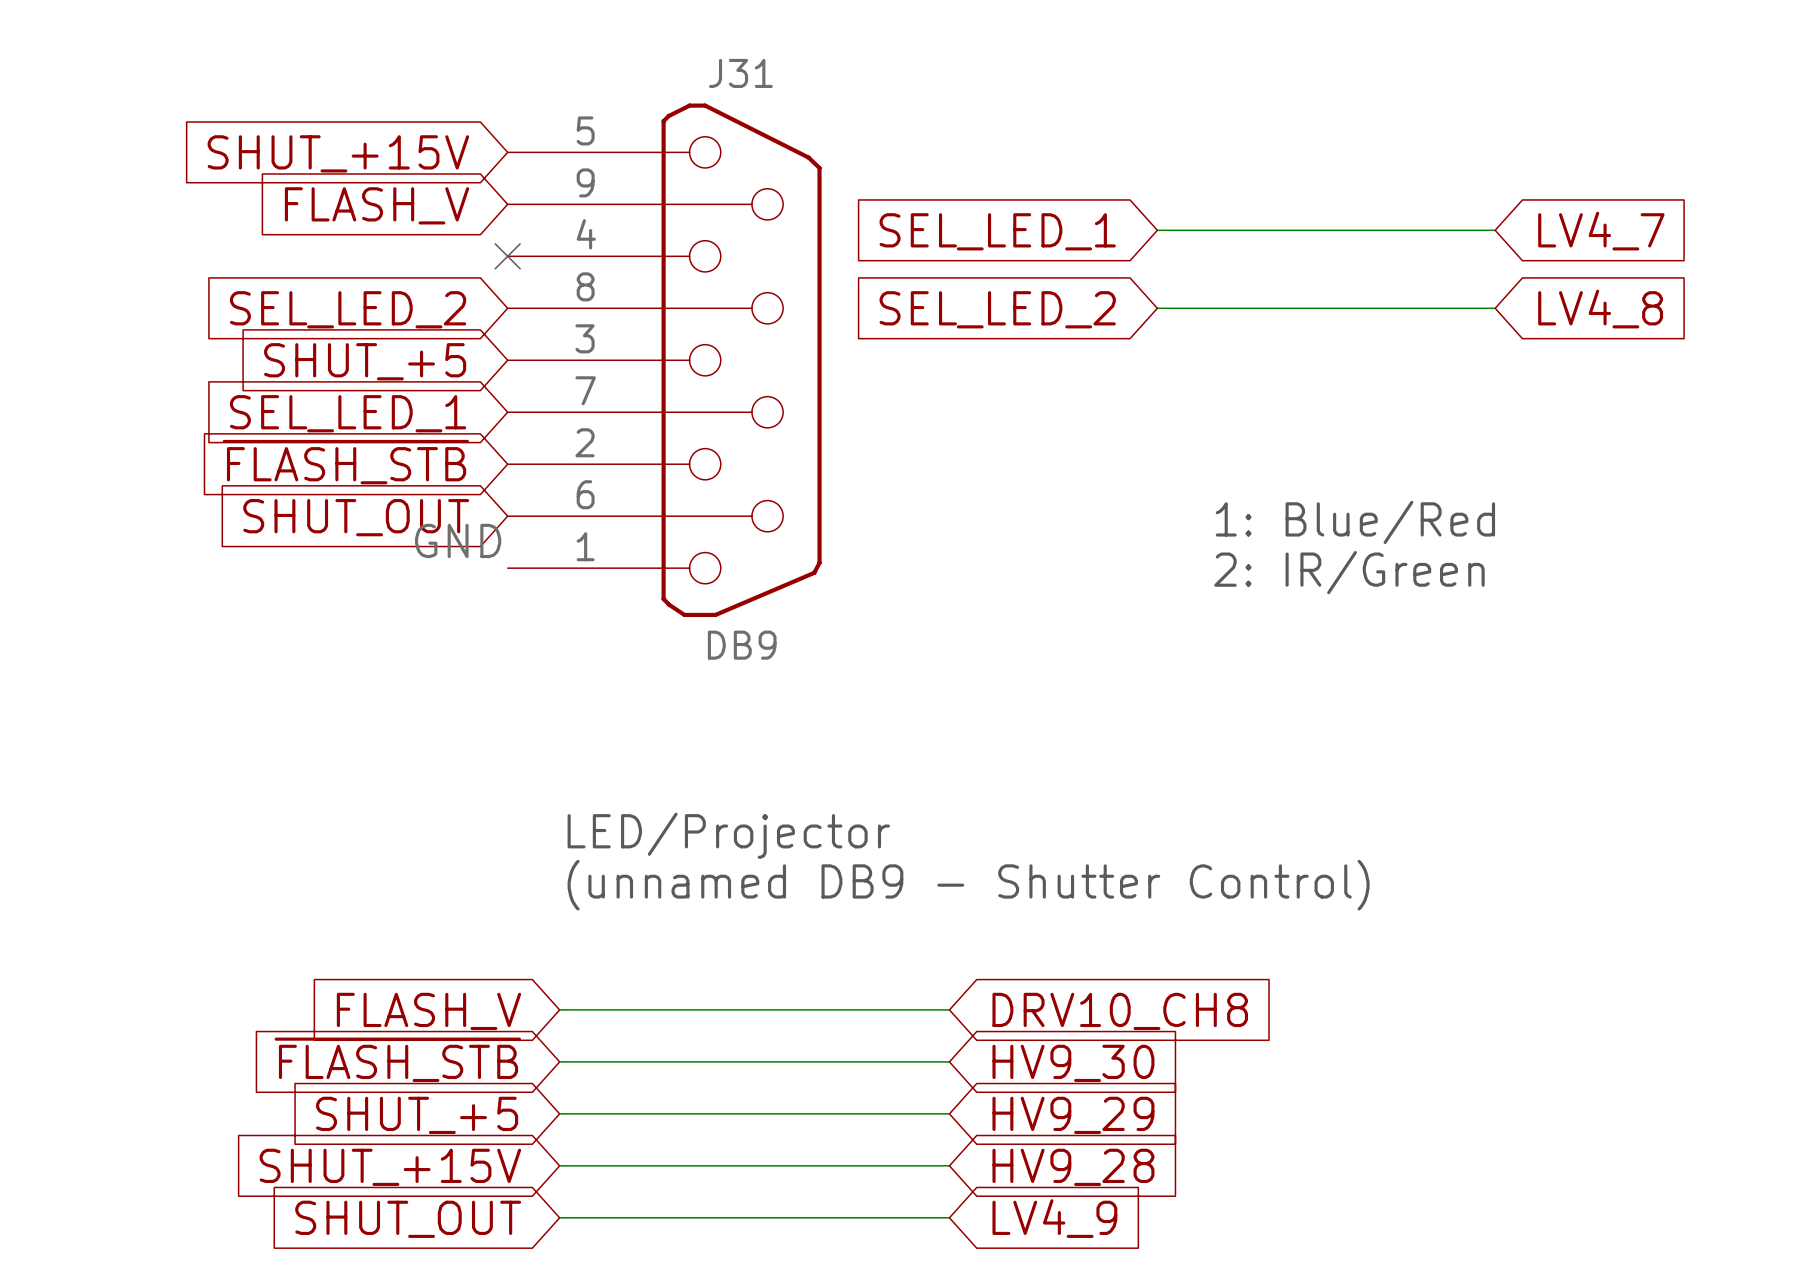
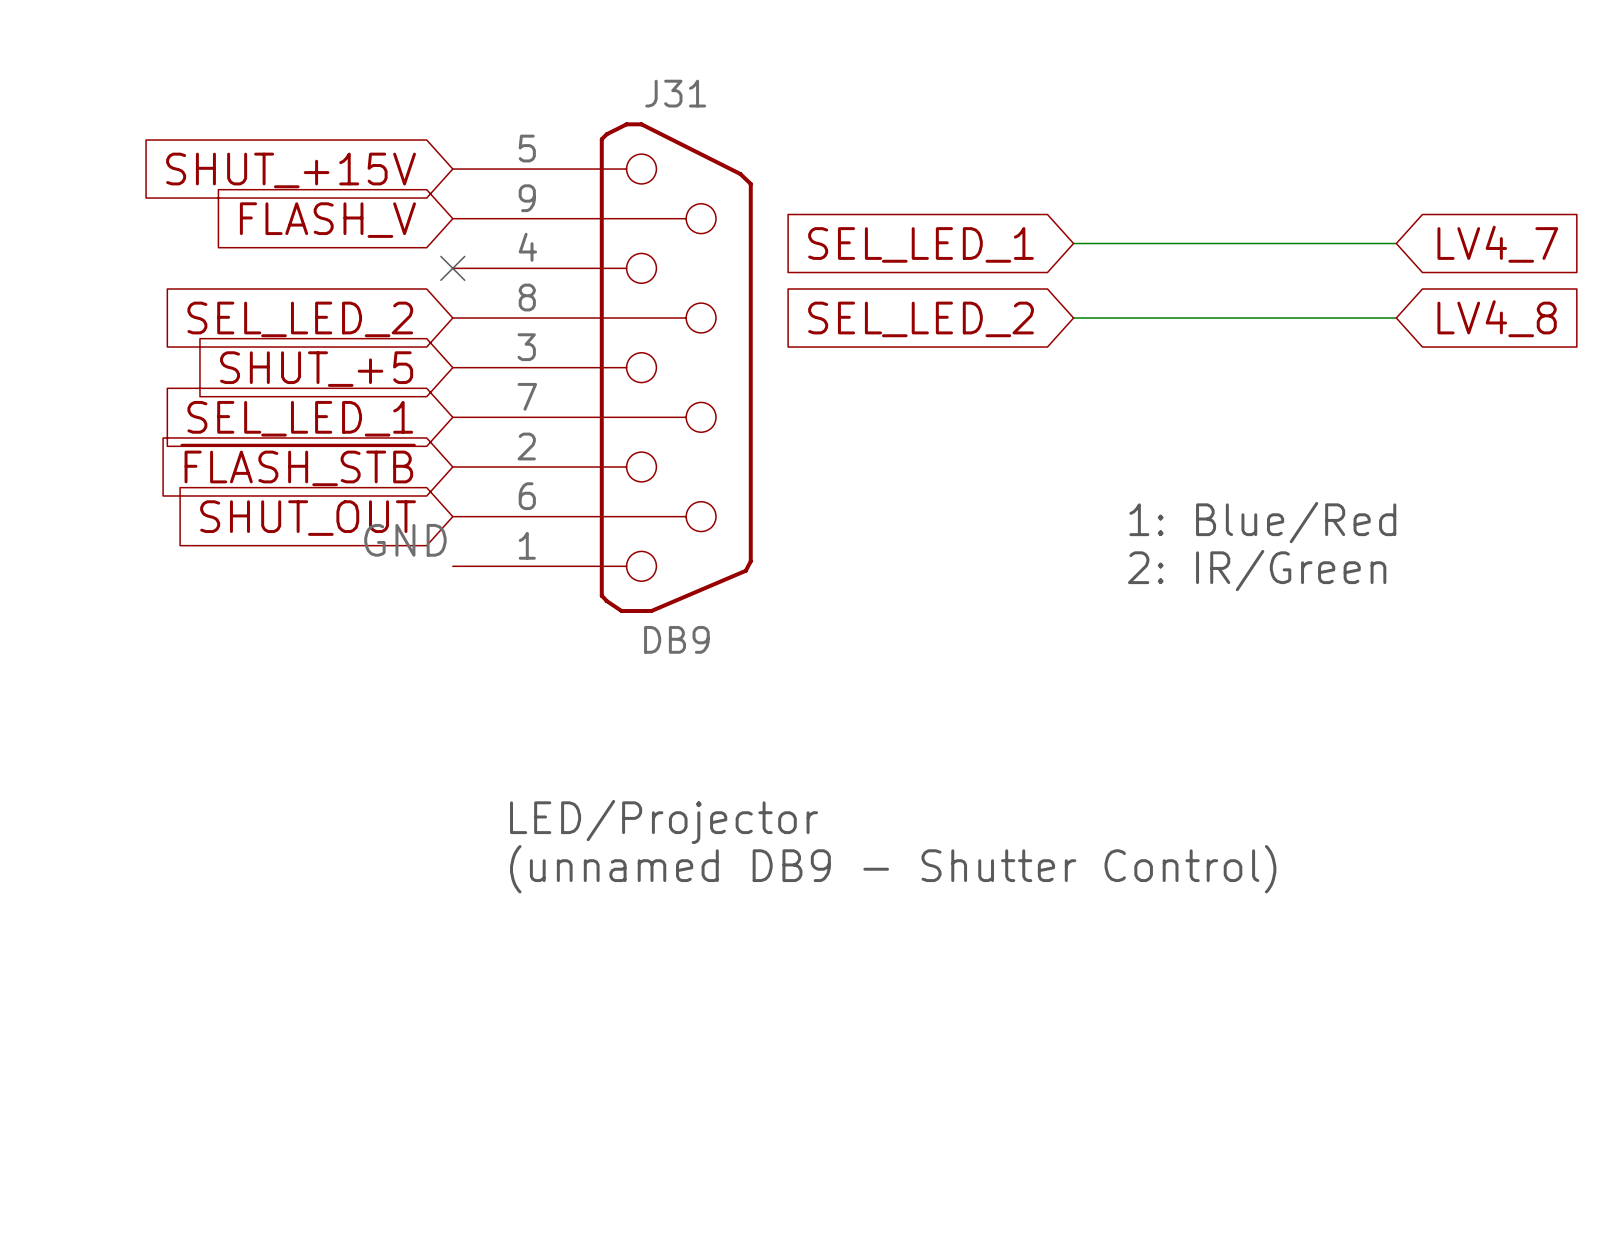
wire: (559, 1009) (949, 1009) -> none
global label: FLASH_V (428, 1011) -> none
global label: DRV10_CH8 (1120, 1011) -> none
global label: ~{FLASH_STB} (397, 1059) -> none
wire: (559, 1061) (949, 1061) -> none
global label: HV9_30 (1073, 1063) -> none
wire: (559, 1113) (949, 1113) -> none
global label: SHUT_+5 (417, 1115) -> none
global label: HV9_29 (1073, 1115) -> none
wire: (559, 1165) (949, 1165) -> none
global label: SHUT_+15V (390, 1167) -> none
global label: HV9_28 (1073, 1167) -> none
wire: (559, 1217) (949, 1217) -> none
global label: LV4_9 (1054, 1218) -> none
global label: SHUT_OUT (408, 1219) -> none

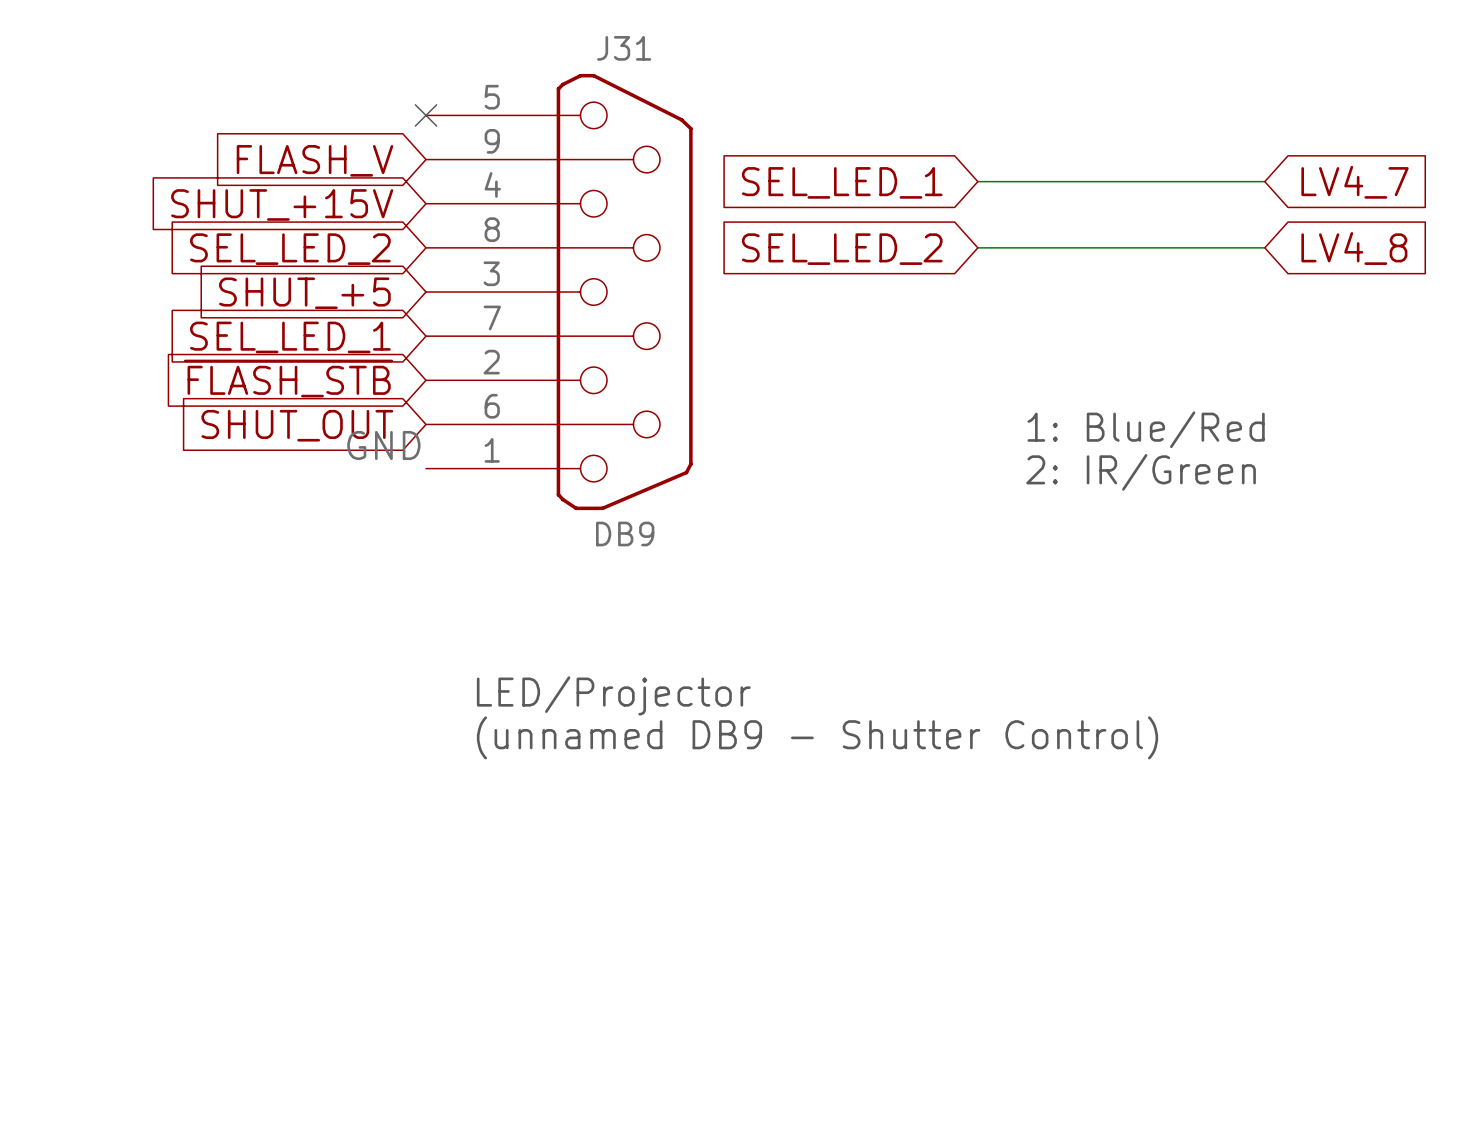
global label position: SHUT_+15V (291, 170) -> SHUT_+15V (282, 204)
no-connect mark position: (452, 268) -> (426, 115)

